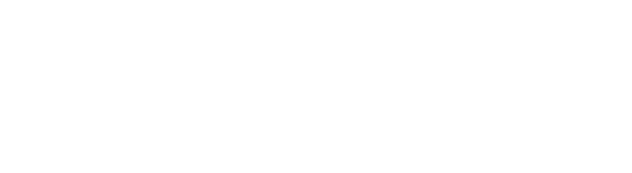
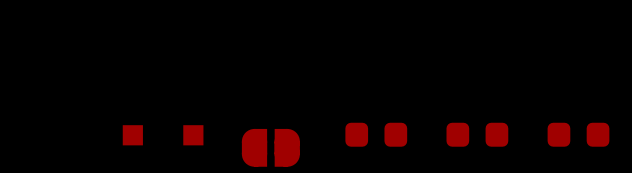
part: none -> (376, 134)
part: none -> (477, 134)
part: none -> (578, 134)
part: none -> (163, 135)
part: none -> (270, 147)

